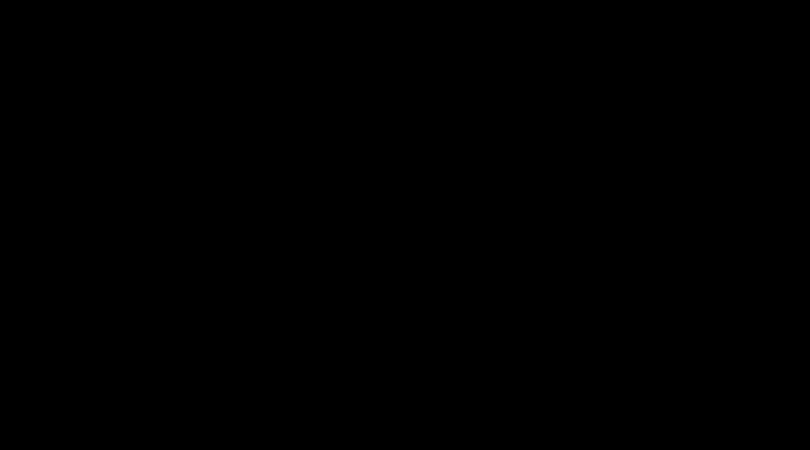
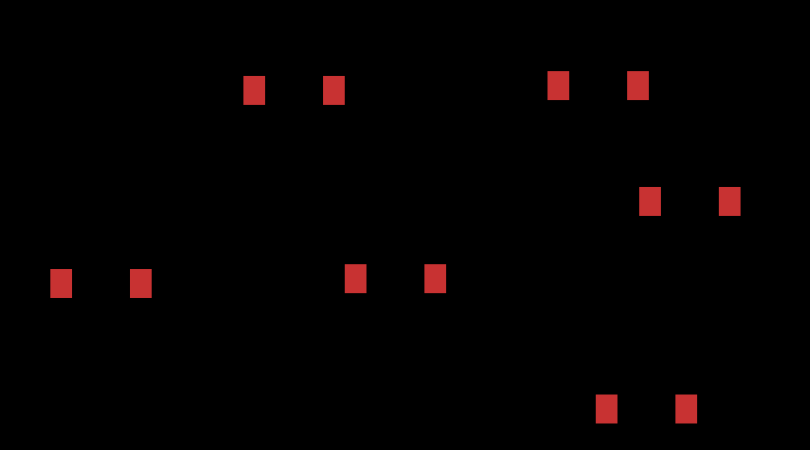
part: none -> (598, 85)
part: none -> (294, 90)
part: none -> (689, 201)
part: none -> (395, 278)
part: none -> (101, 283)
part: none -> (646, 409)

